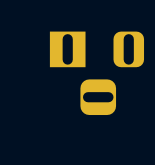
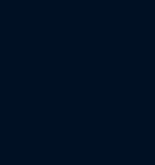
part: (96, 73) -> none

